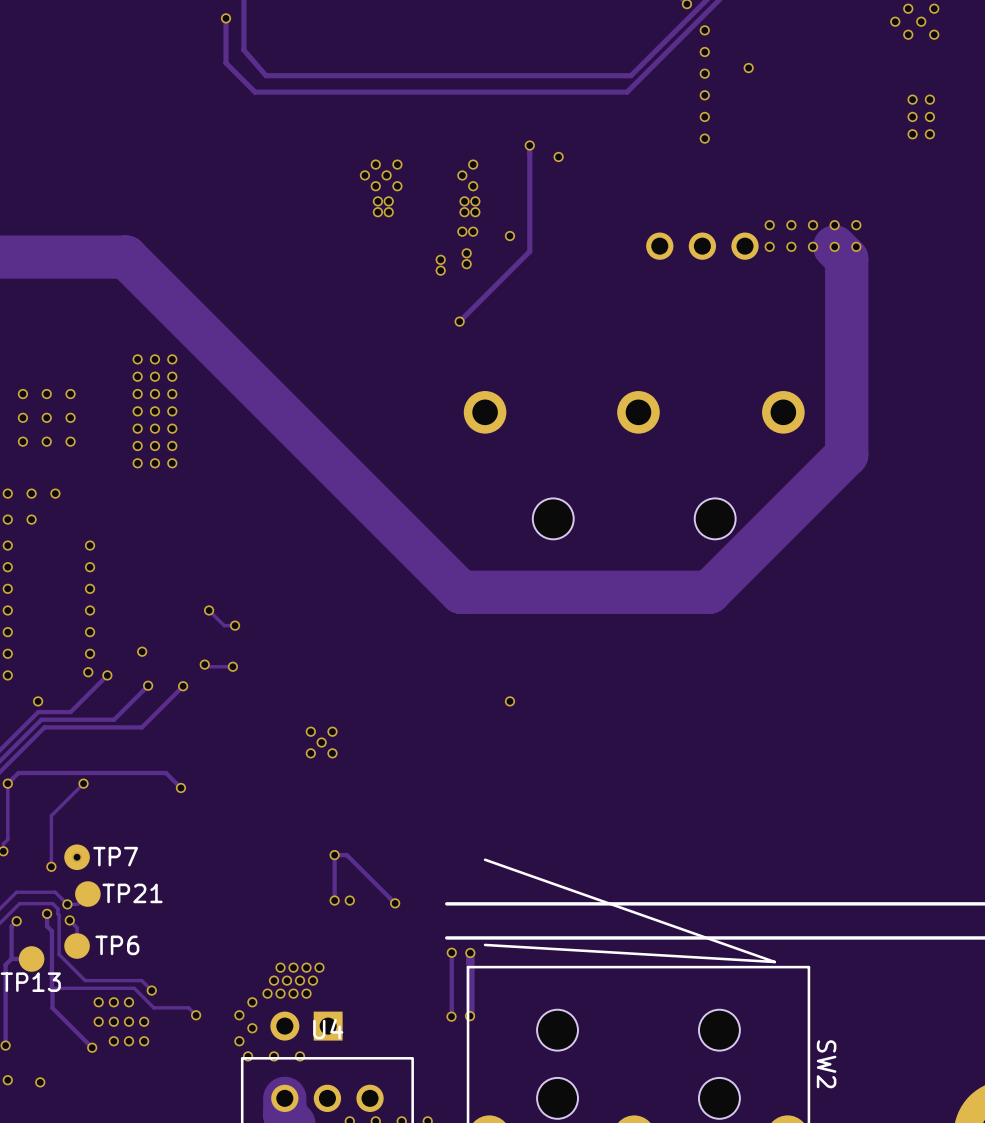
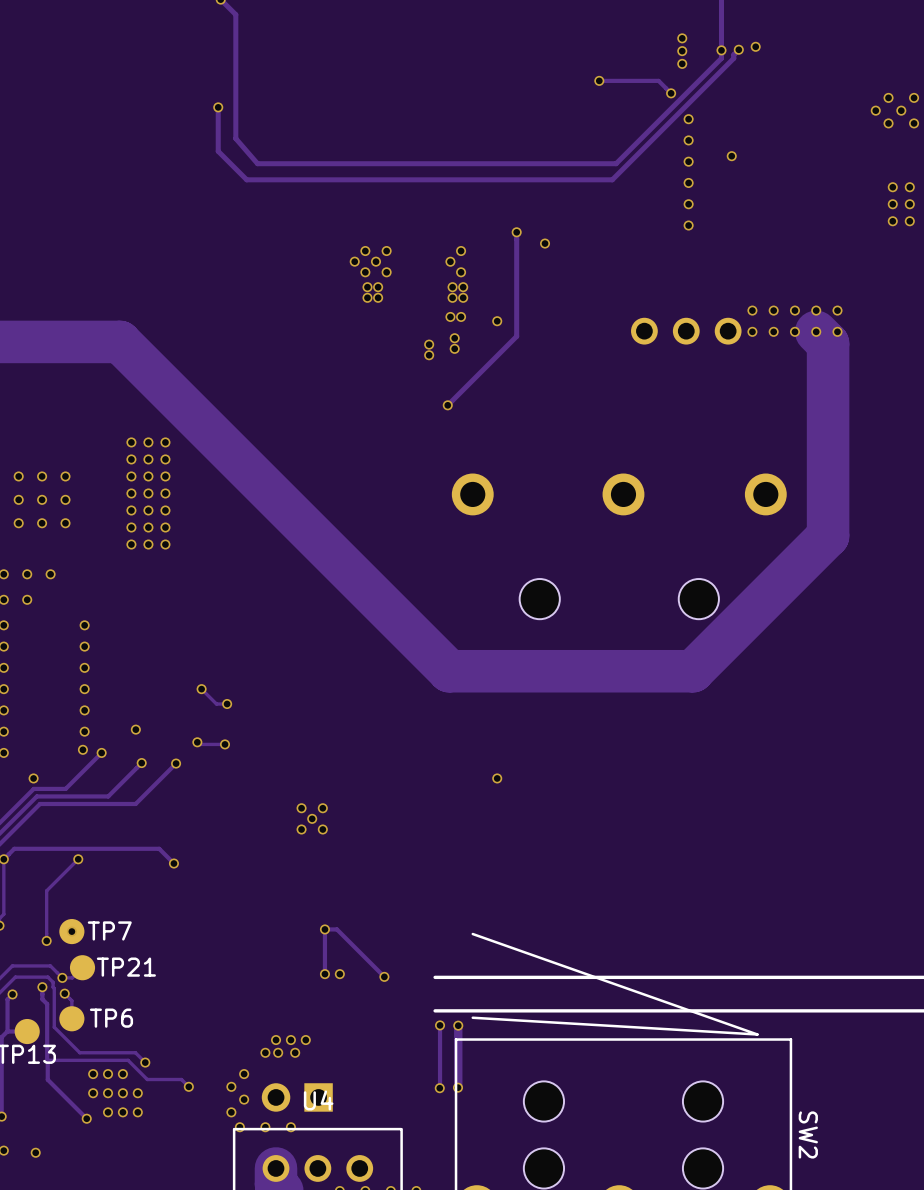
via: (280, 967) -> none
via: none -> (276, 1040)
via: (293, 967) -> none
via: none -> (290, 1040)
via: (306, 967) -> none
via: none -> (305, 1040)
via: (319, 967) -> none
via: (300, 980) -> none
via: none -> (295, 1052)
via: (312, 980) -> none
via: (267, 993) -> none
via: (280, 993) -> none
via: (293, 993) -> none
via: (306, 993) -> none

